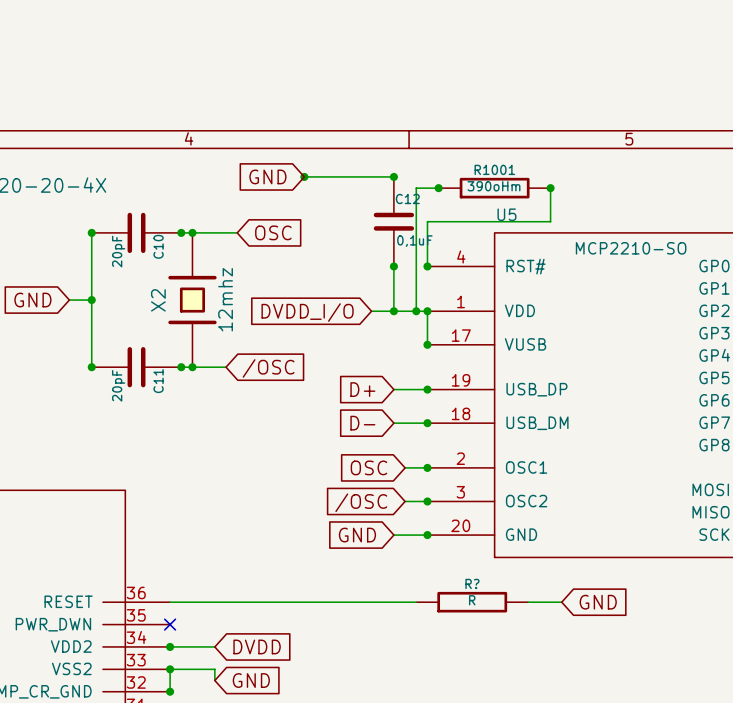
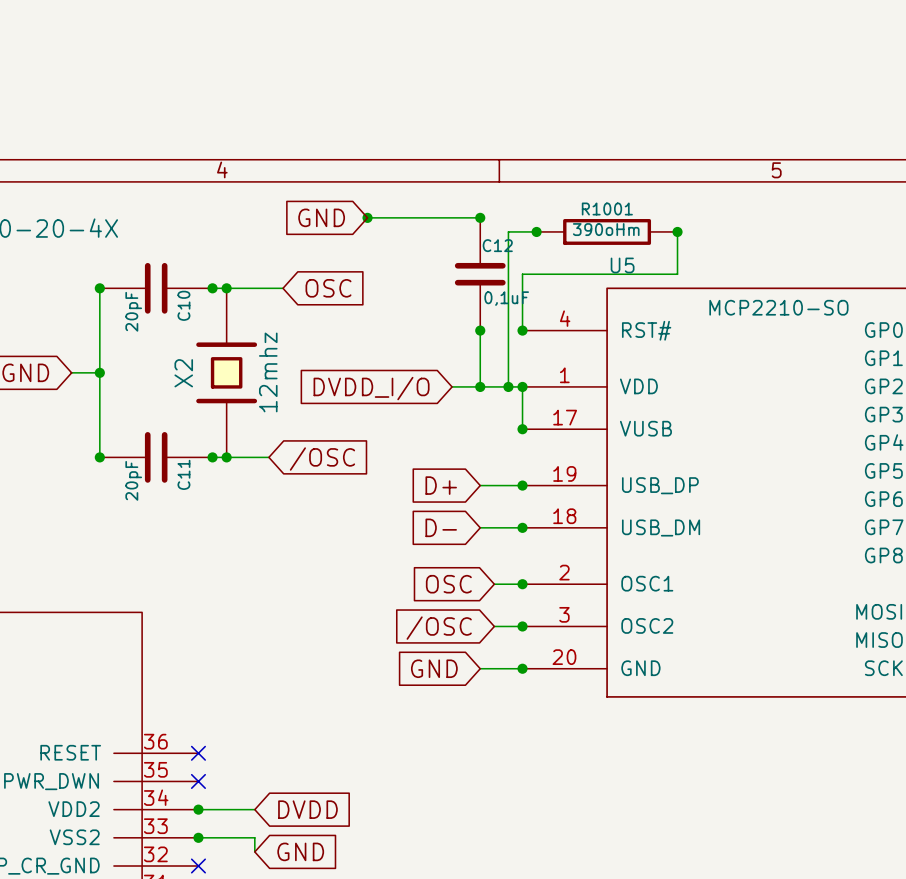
wire: (170, 602) (416, 602) -> none
no-connect mark: none -> (198, 753)
R?: R (472, 602) -> none
wire: (528, 602) (561, 602) -> none
global label: GND (598, 602) -> none
wire: (170, 669) (170, 691) -> none
junction: (170, 691) -> none
no-connect mark: none -> (198, 866)

